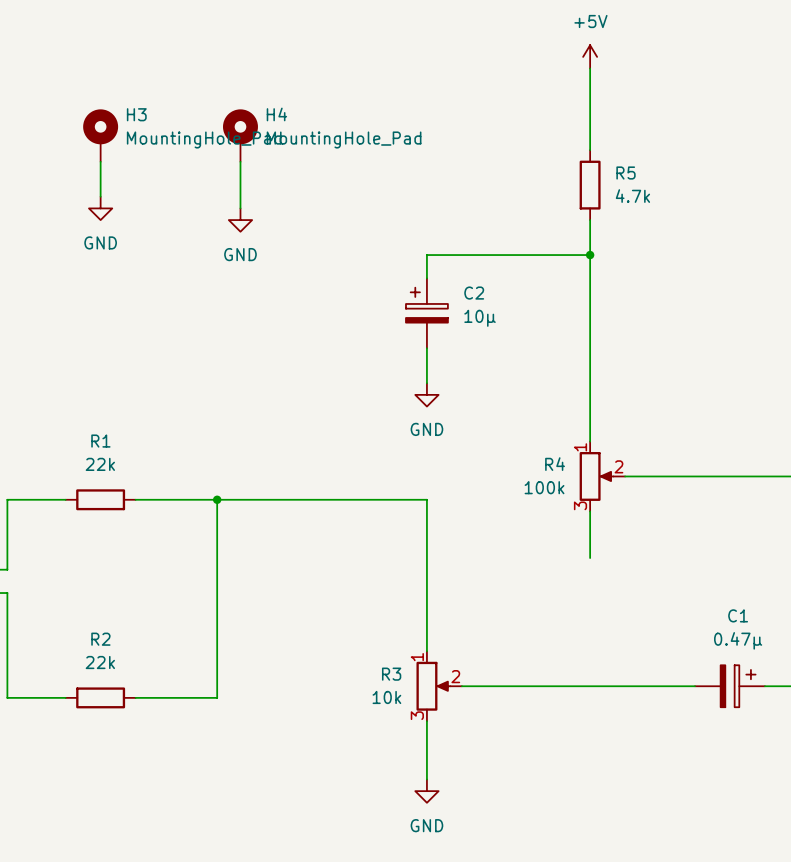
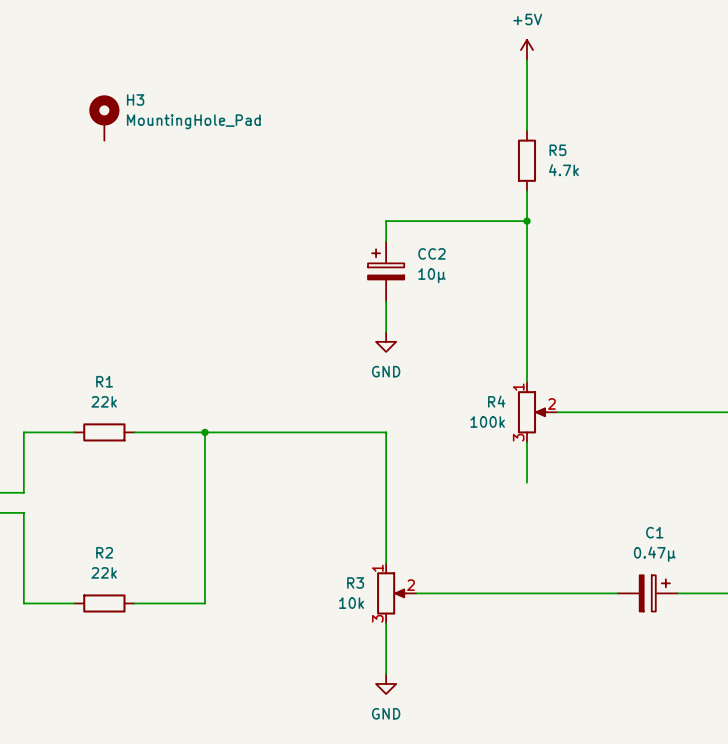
H4: MountingHole_Pad (240, 135) -> none
wire: (100, 161) (100, 196) -> none
wire: (240, 161) (240, 208) -> none
power symbol: GND (100, 208) -> none
power symbol: GND (240, 220) -> none
C2 name: C2 (474, 293) -> CC2 (431, 253)

